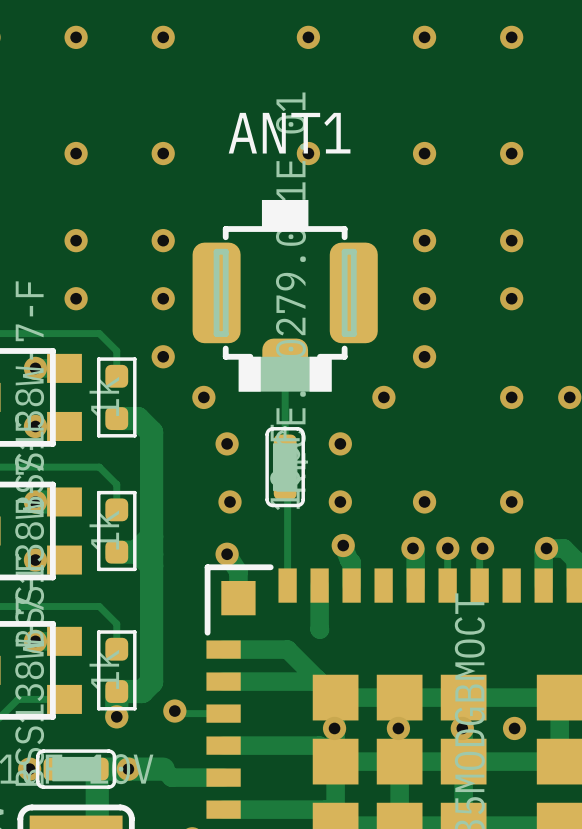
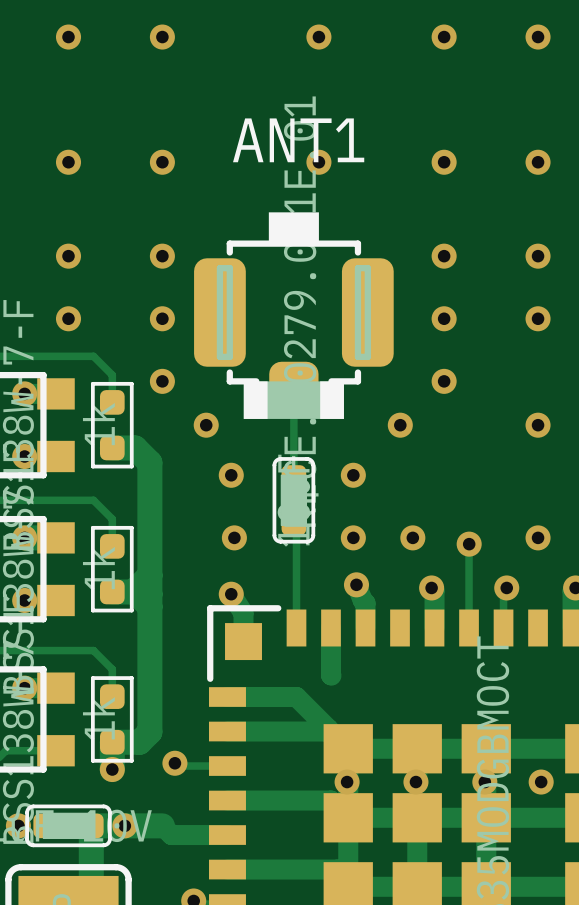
via: none -> (412, 537)
via: (424, 501) -> none
track: none -> (469, 544) (469, 588)
via: none -> (469, 544)
via: (447, 548) -> none

